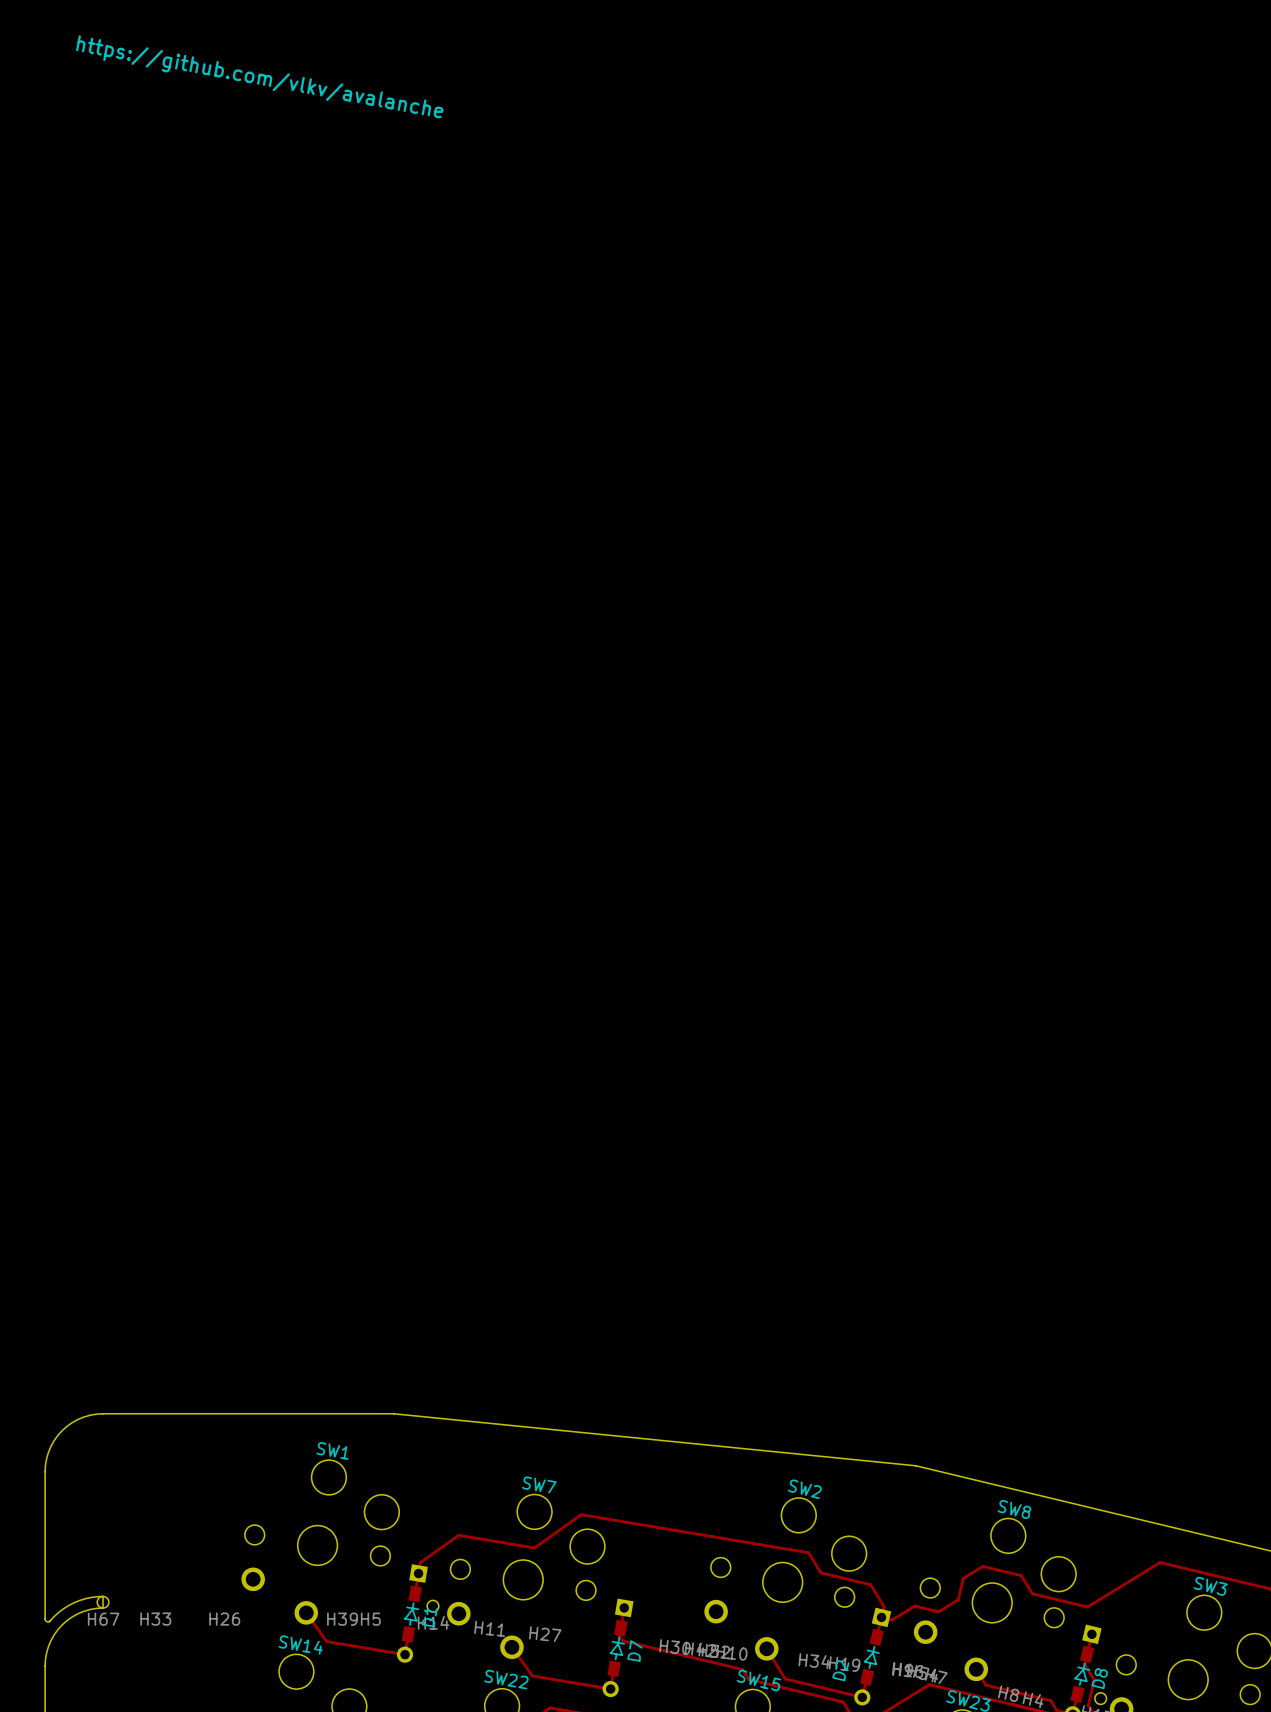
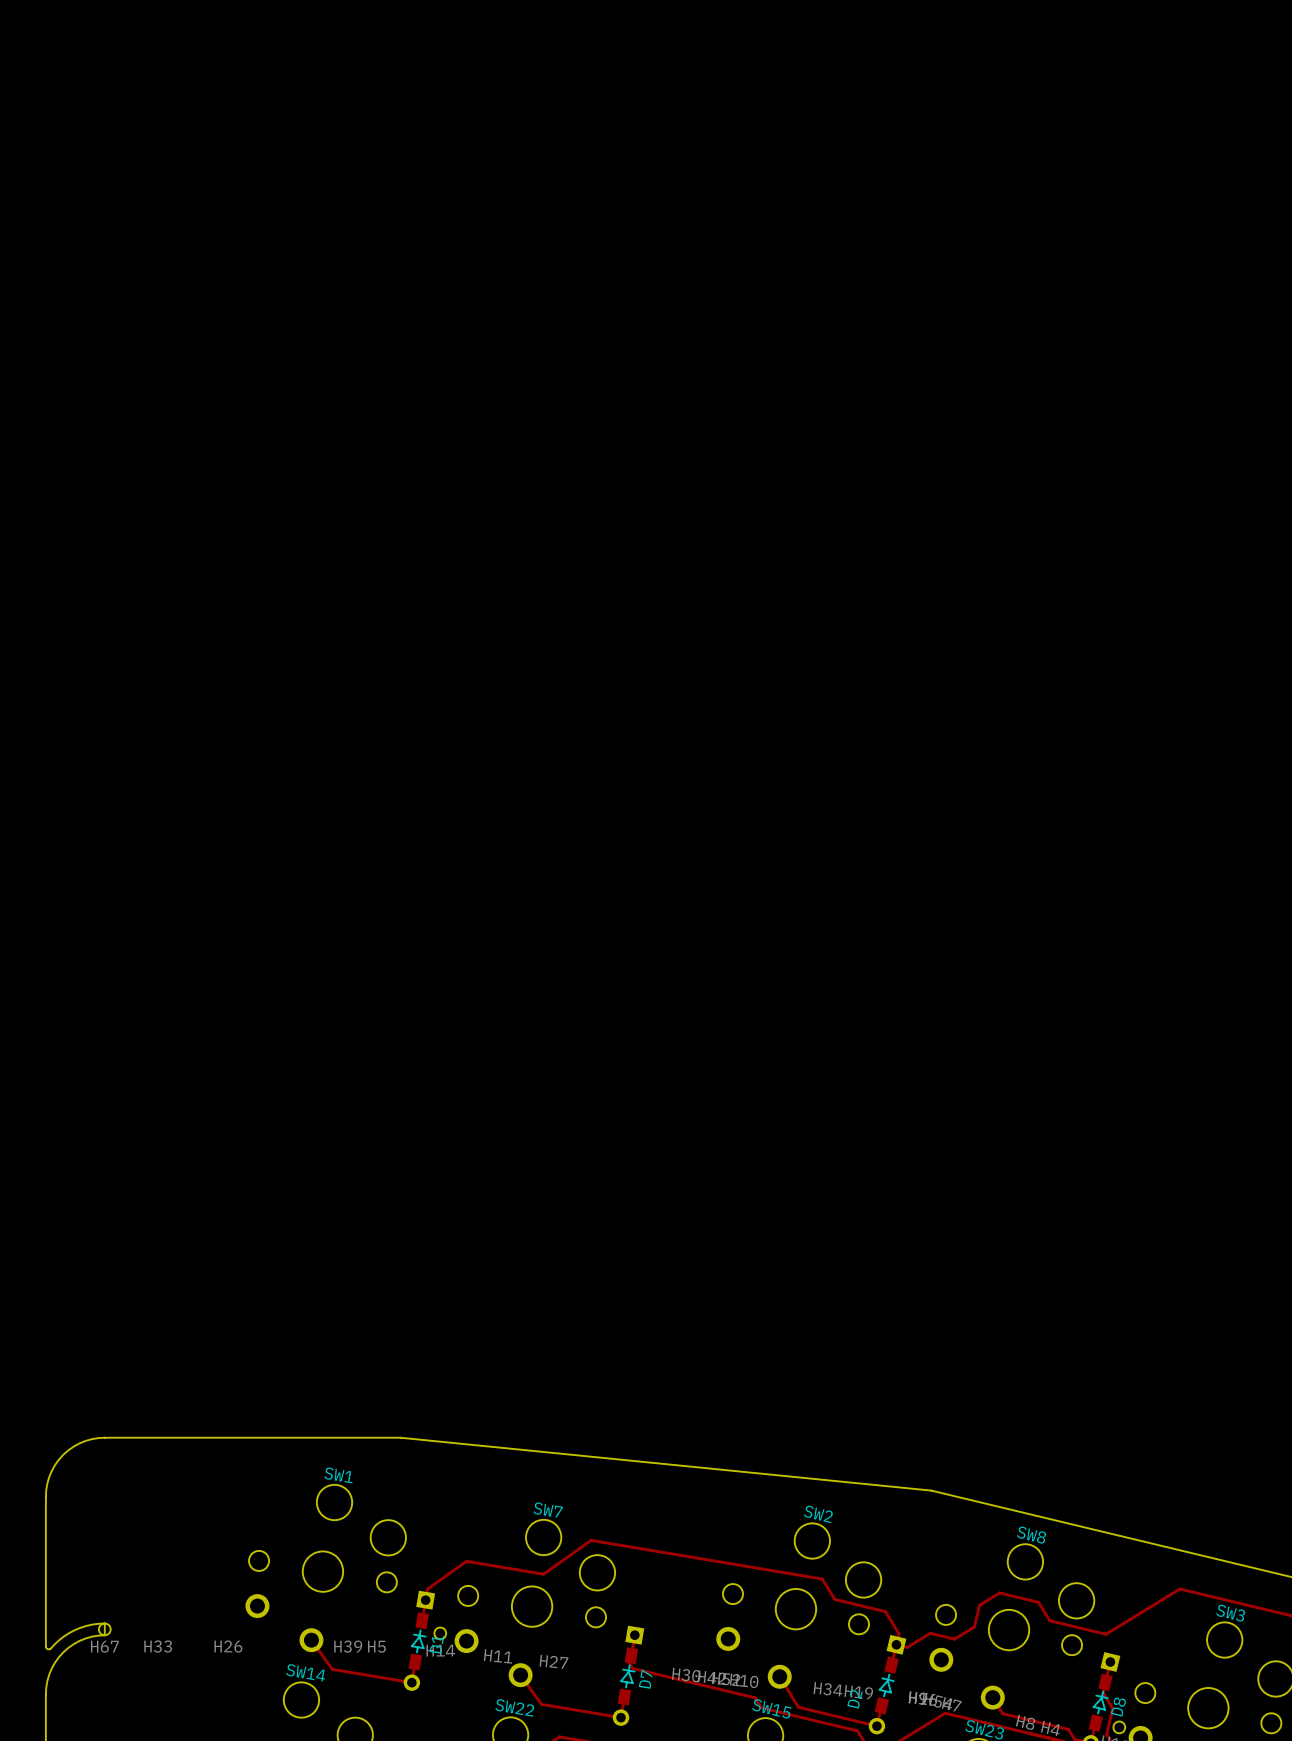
text: https://github.com/vlkv/avalanche (259, 76) -> none

